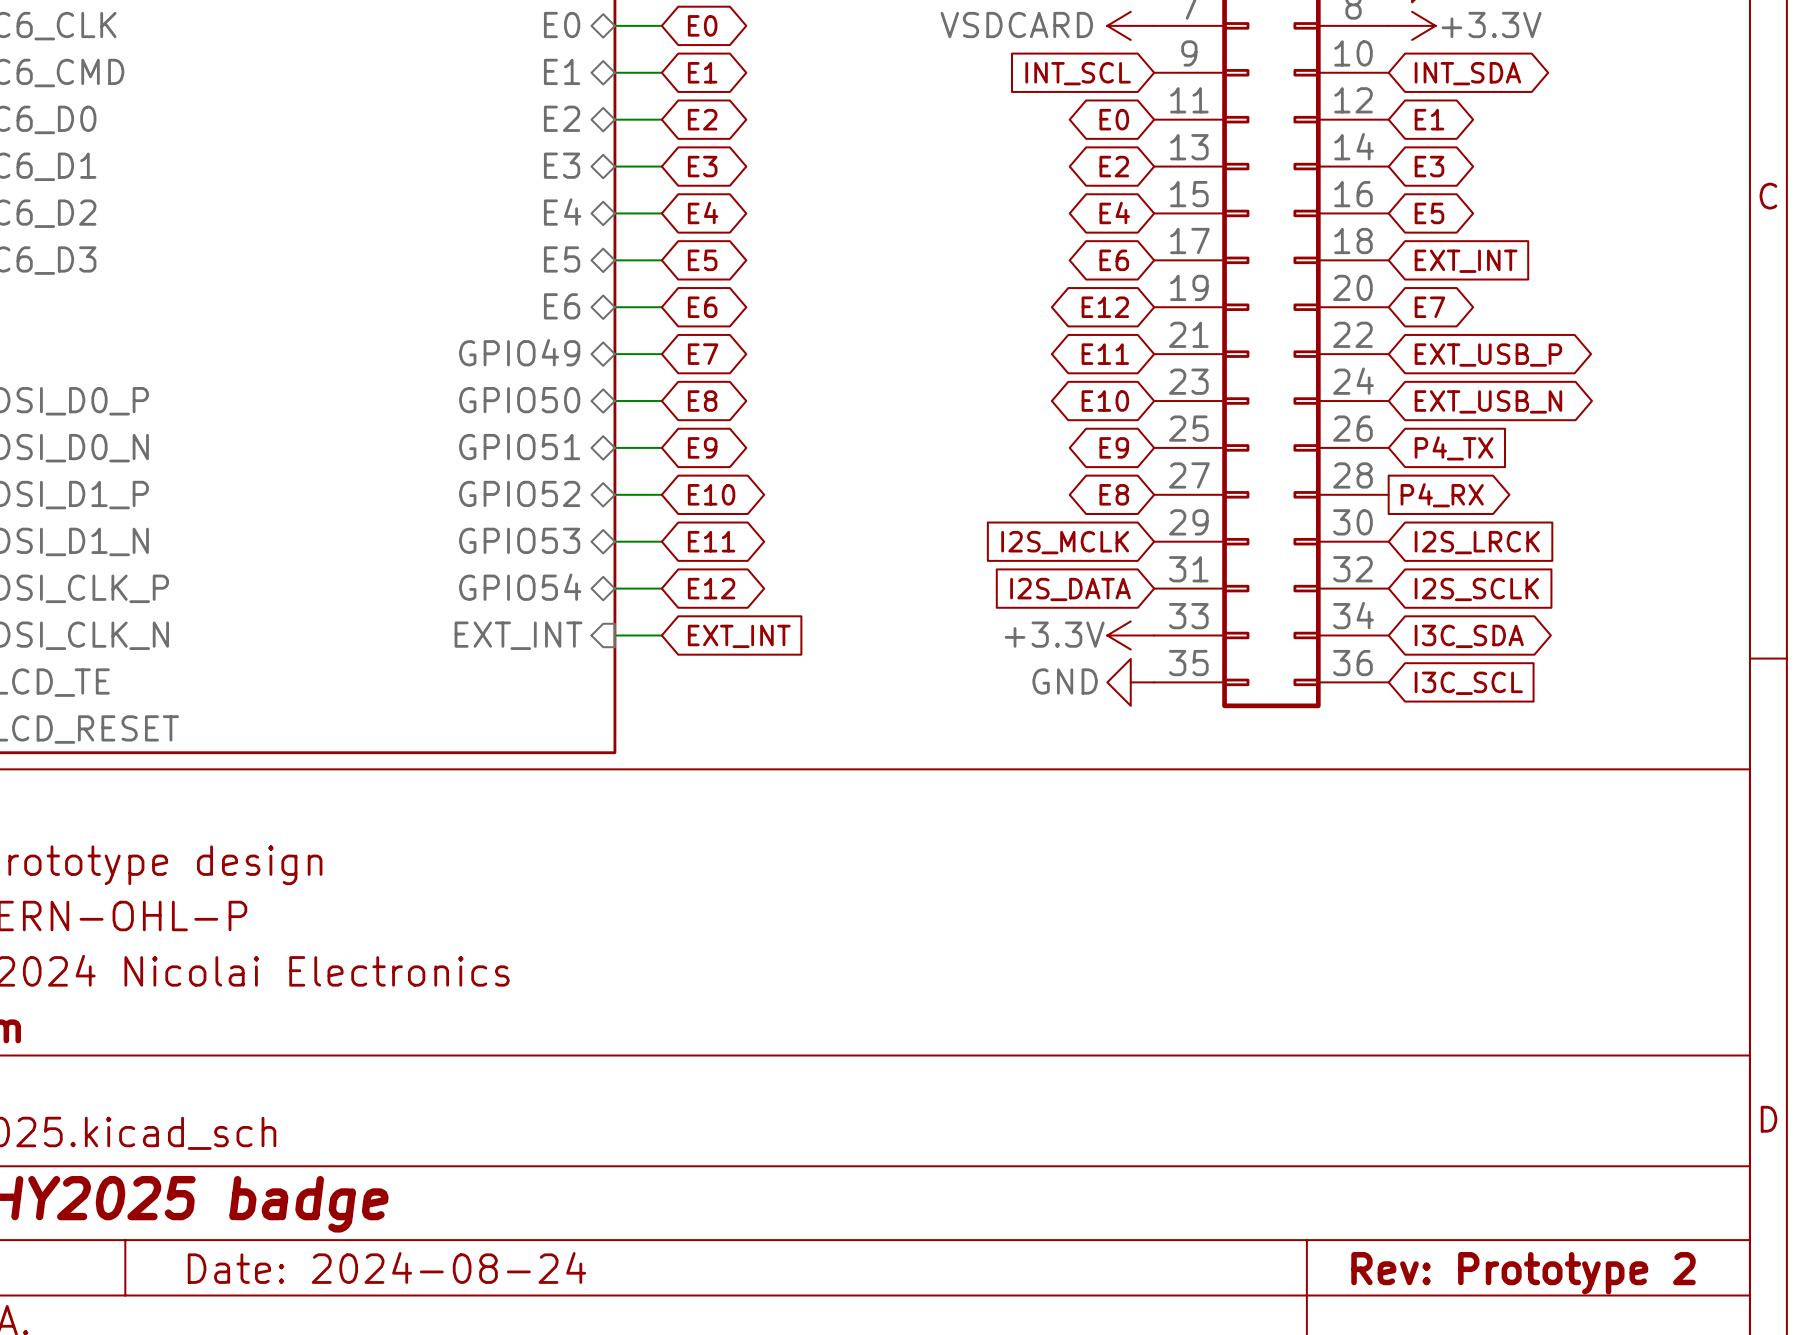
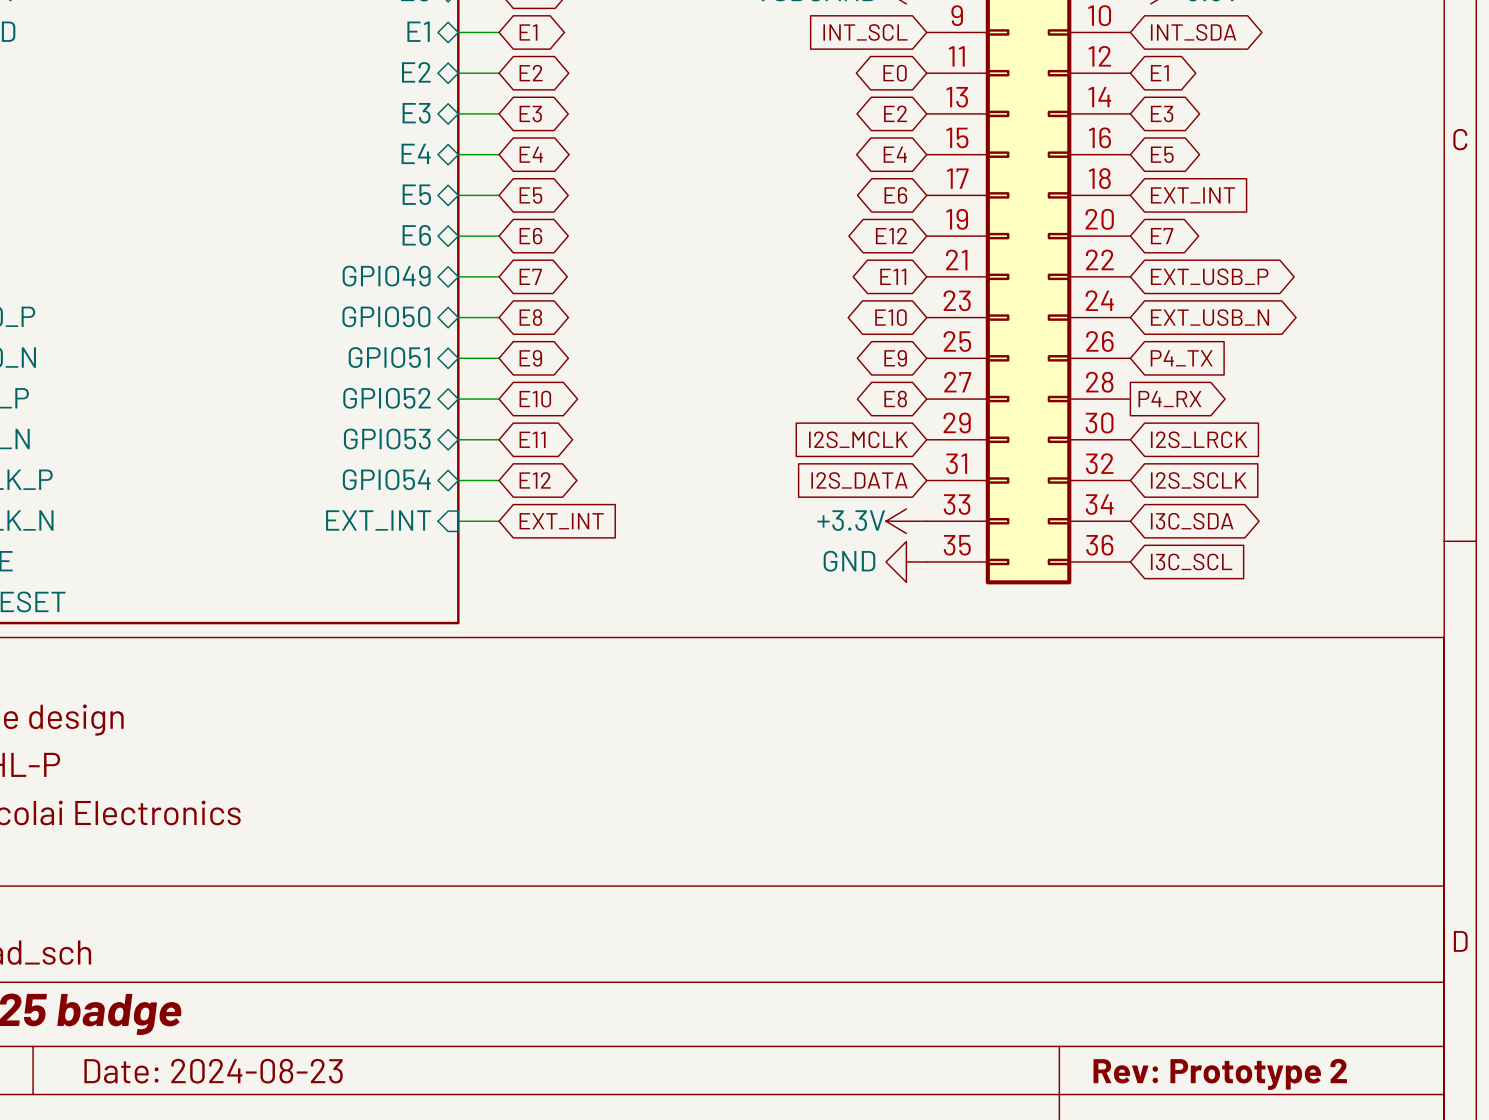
title block: Date: 2024-08-24 (386, 1267) -> Date: 2024-08-23 (213, 1071)

